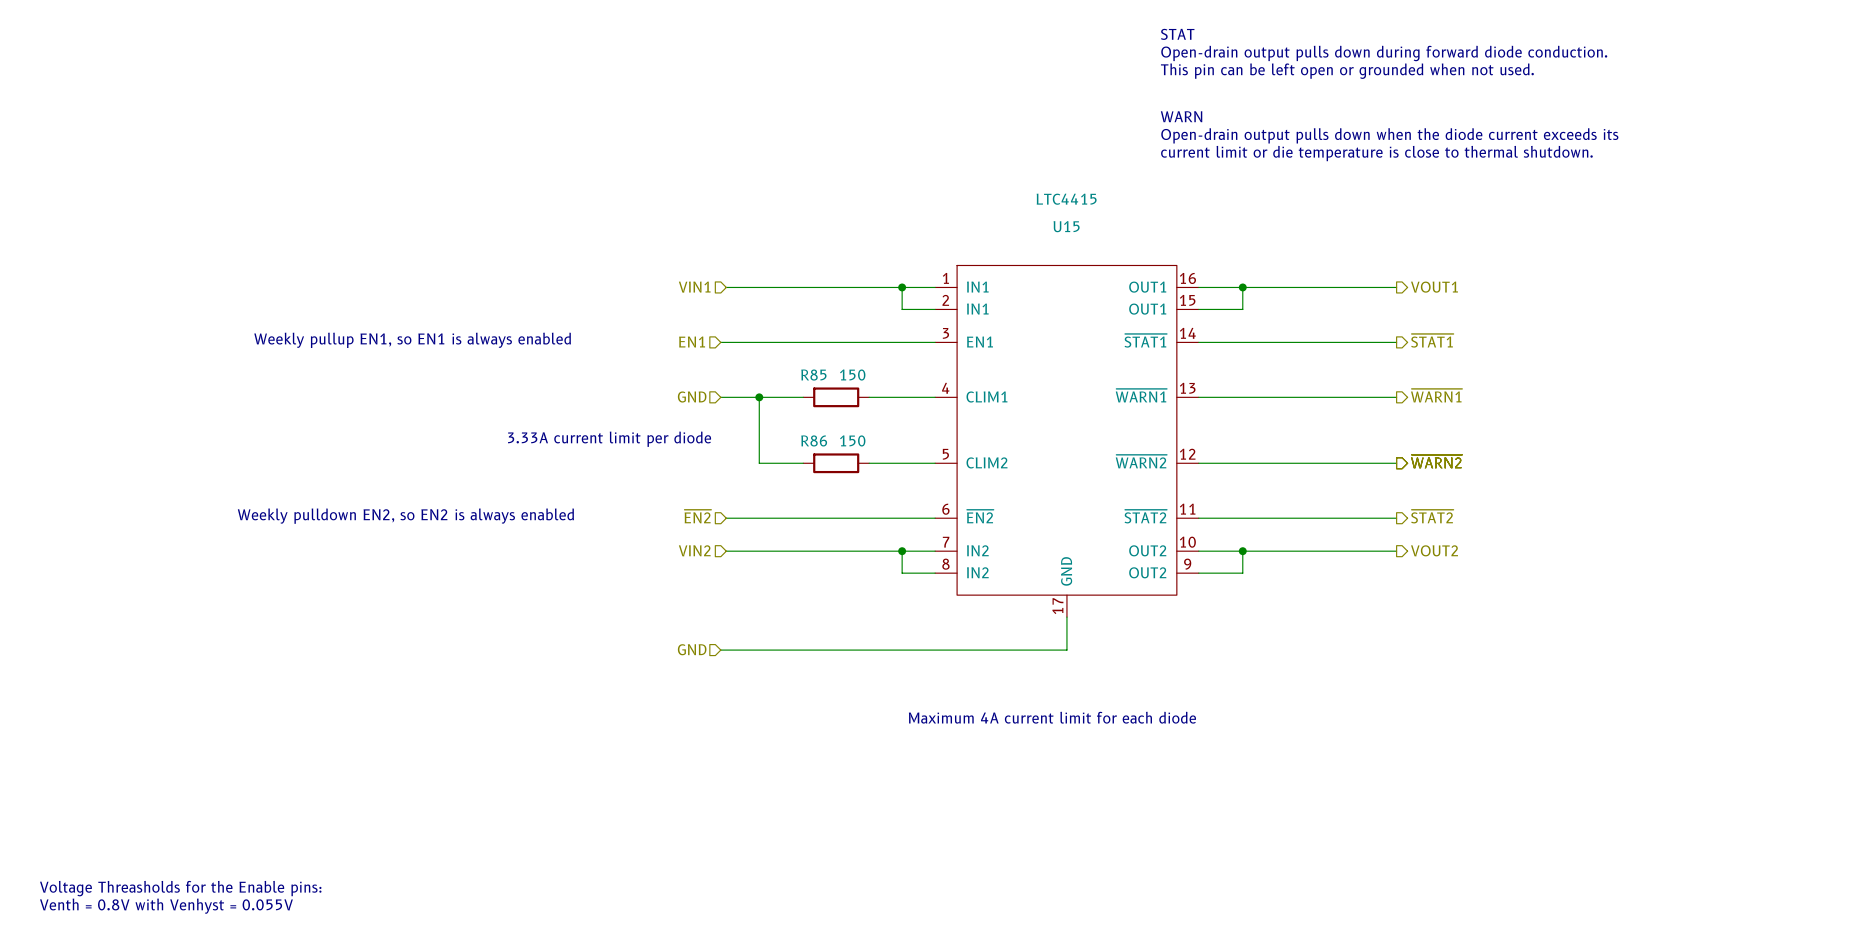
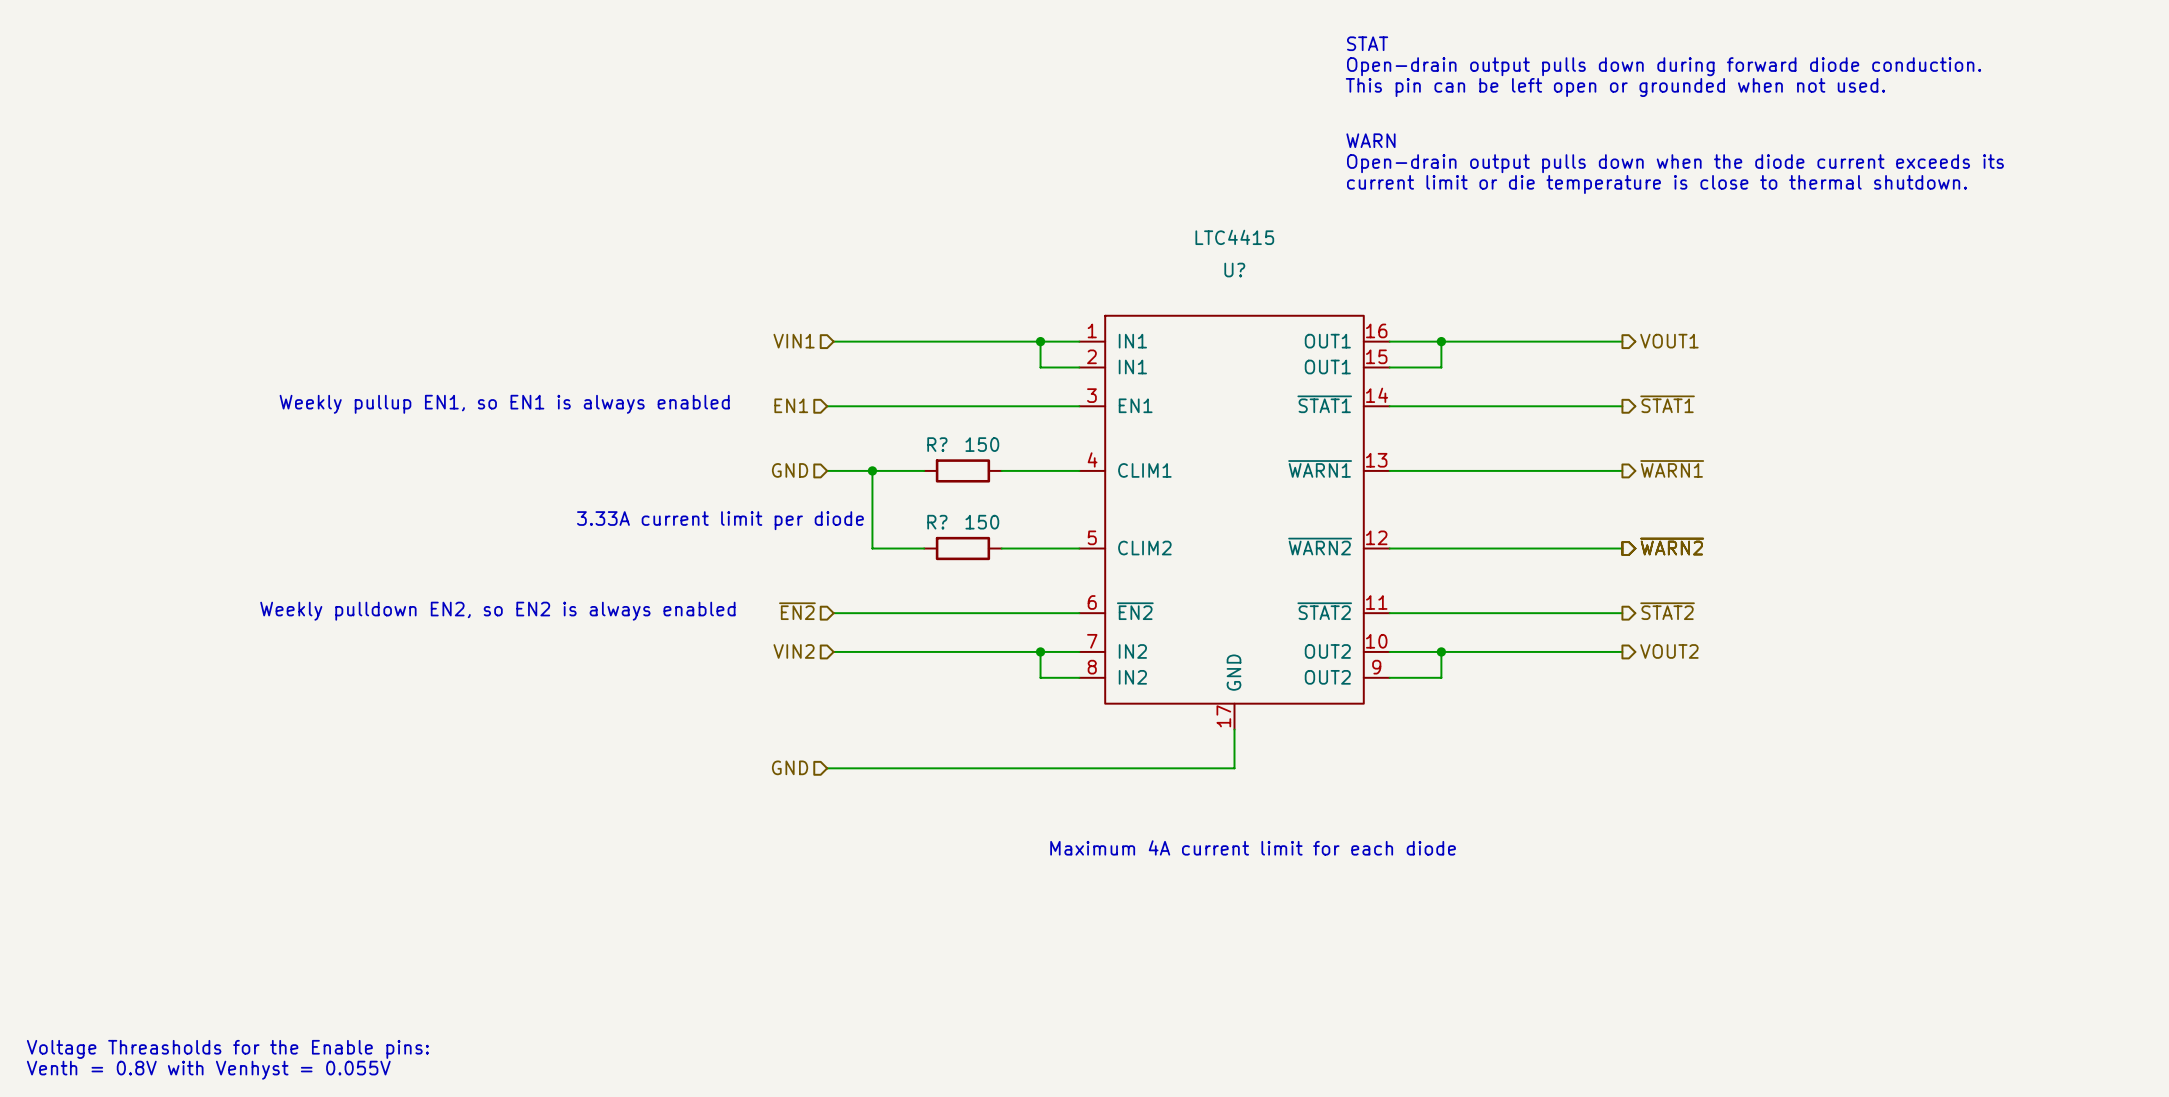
U15 name: U15 (1066, 226) -> U? (1234, 270)
R85 name: R85 (813, 375) -> R? (937, 444)
R86 name: R86 (814, 440) -> R? (937, 522)

